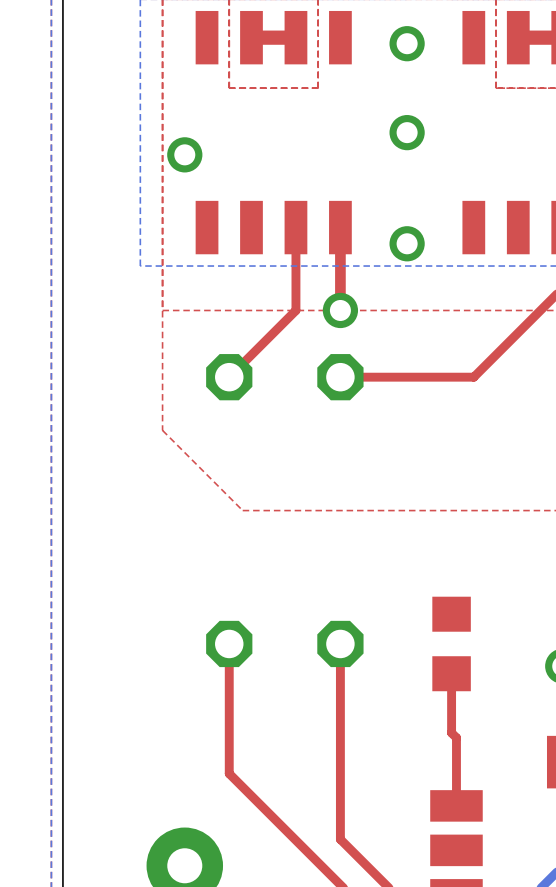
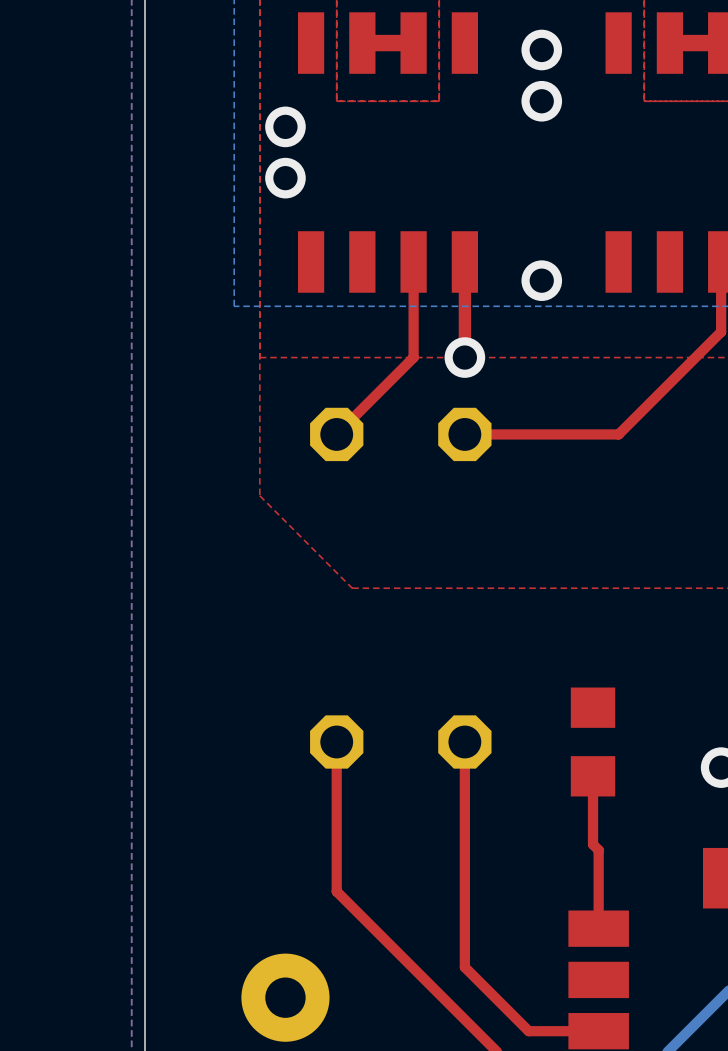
via: none -> (285, 126)
via position: (407, 132) -> (541, 101)

